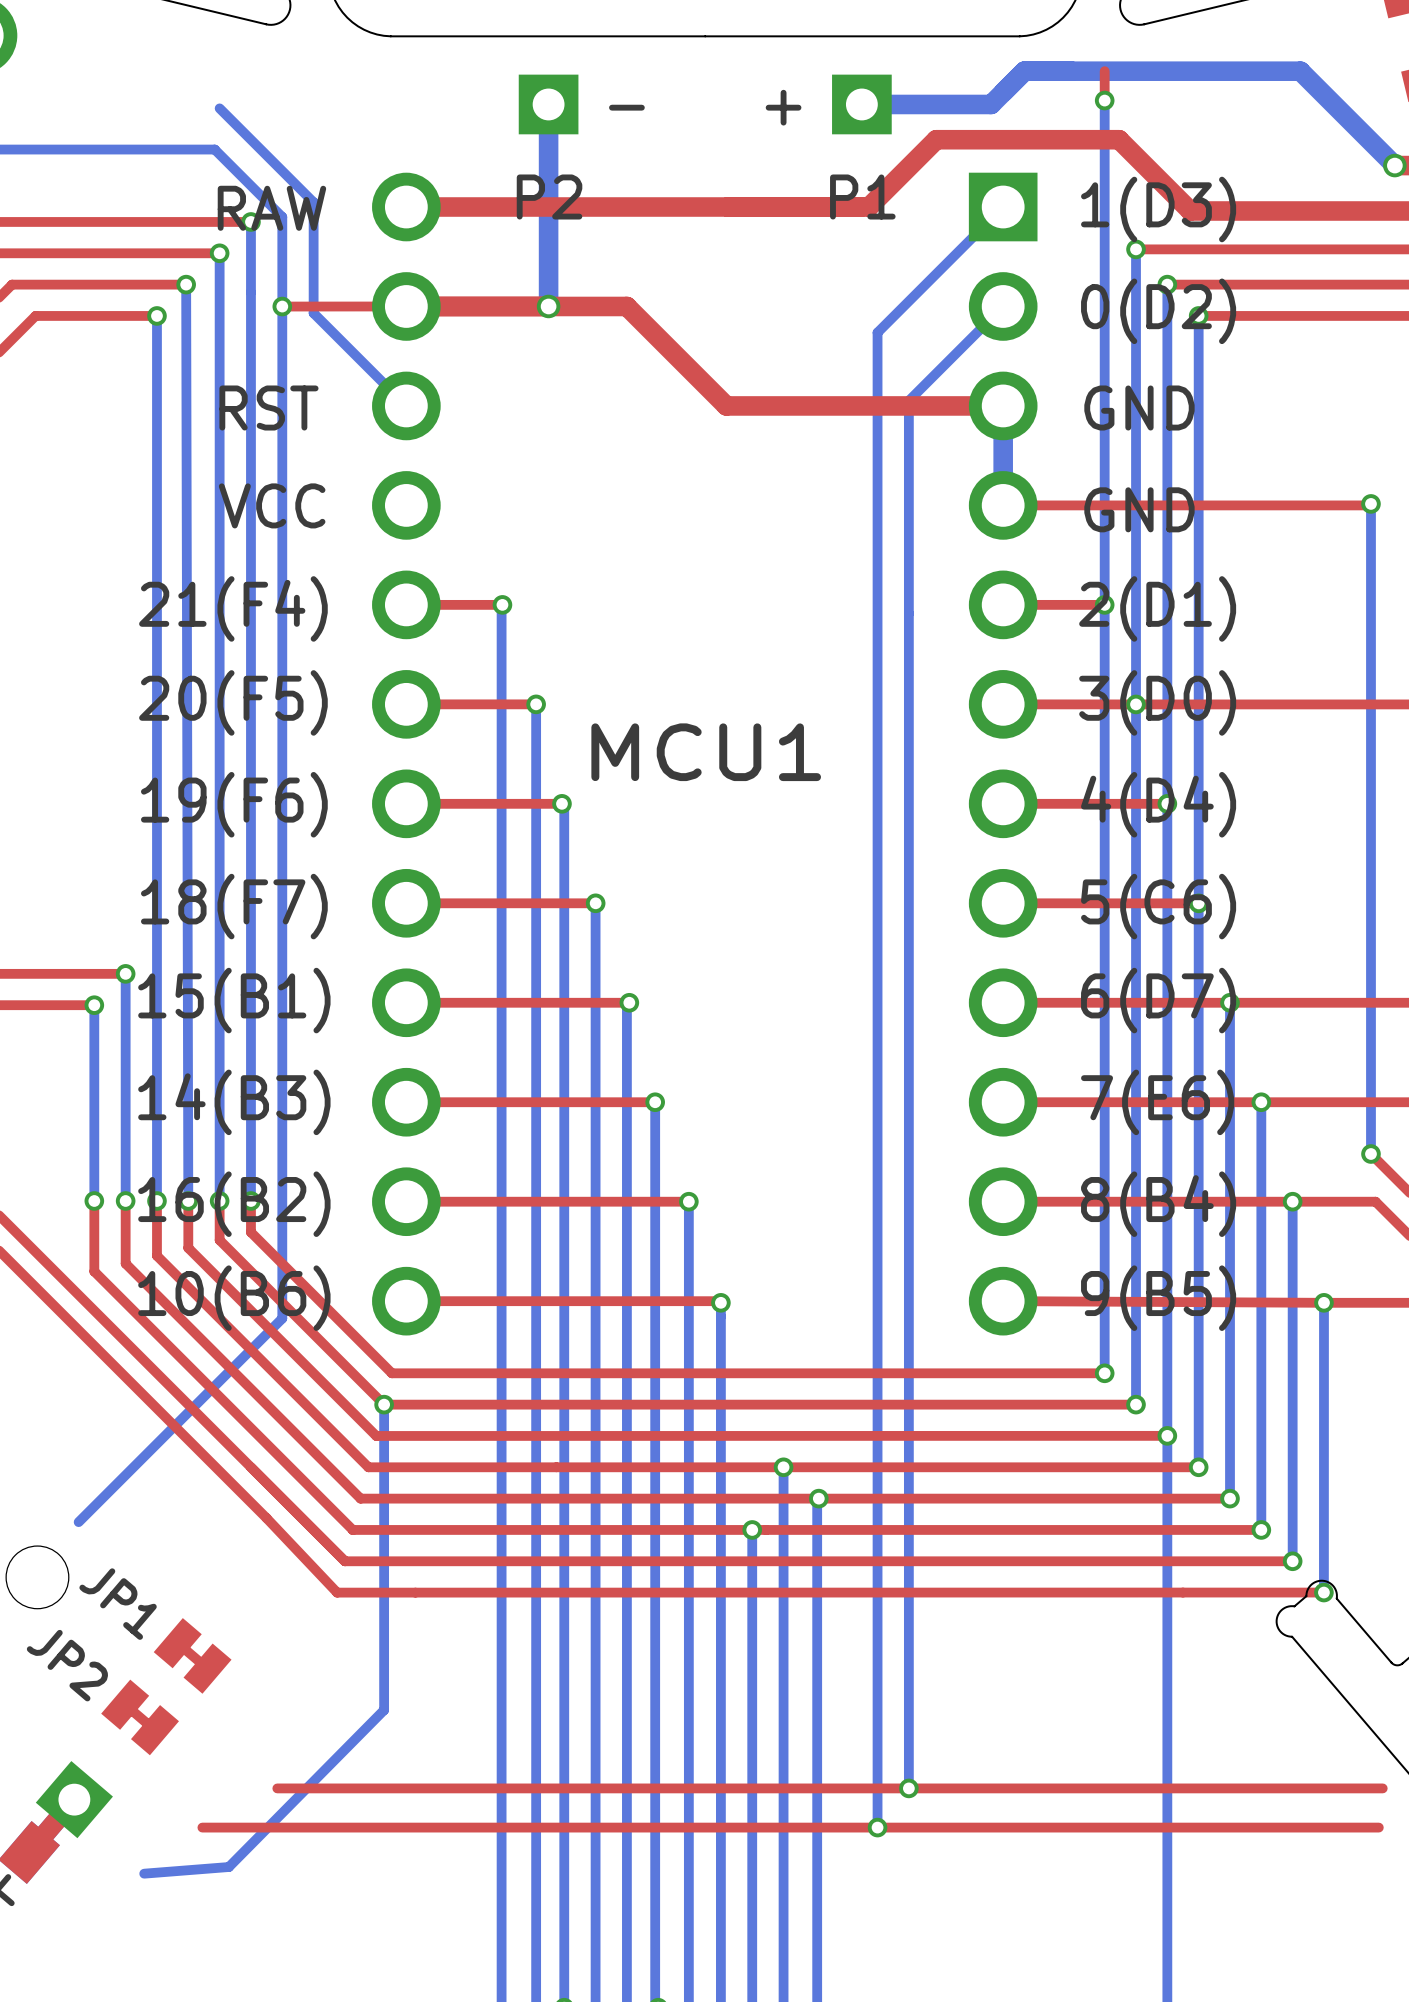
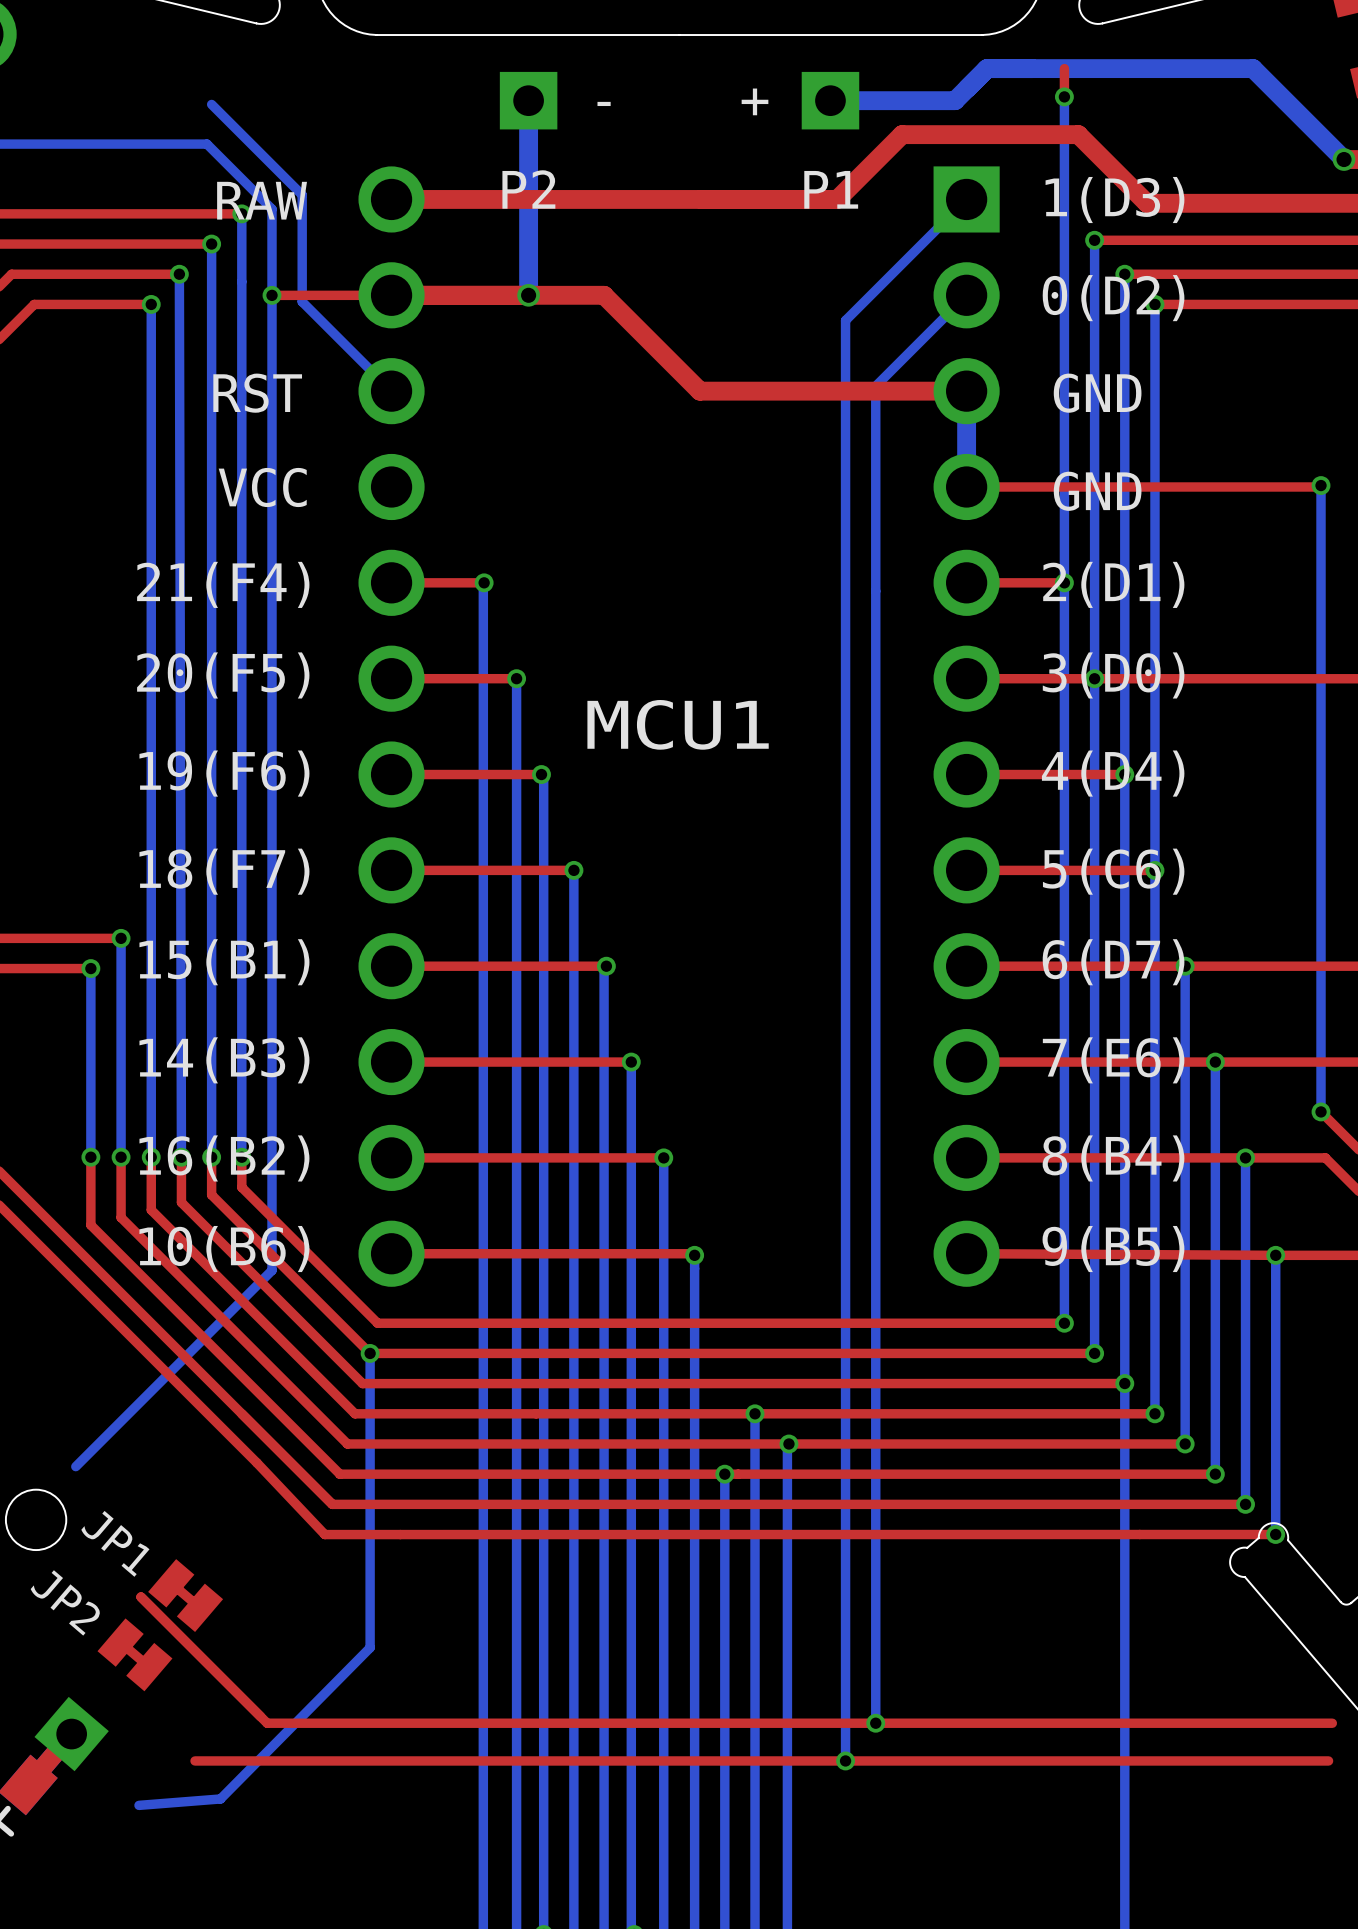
top track: none -> (140, 1596) (267, 1723)

